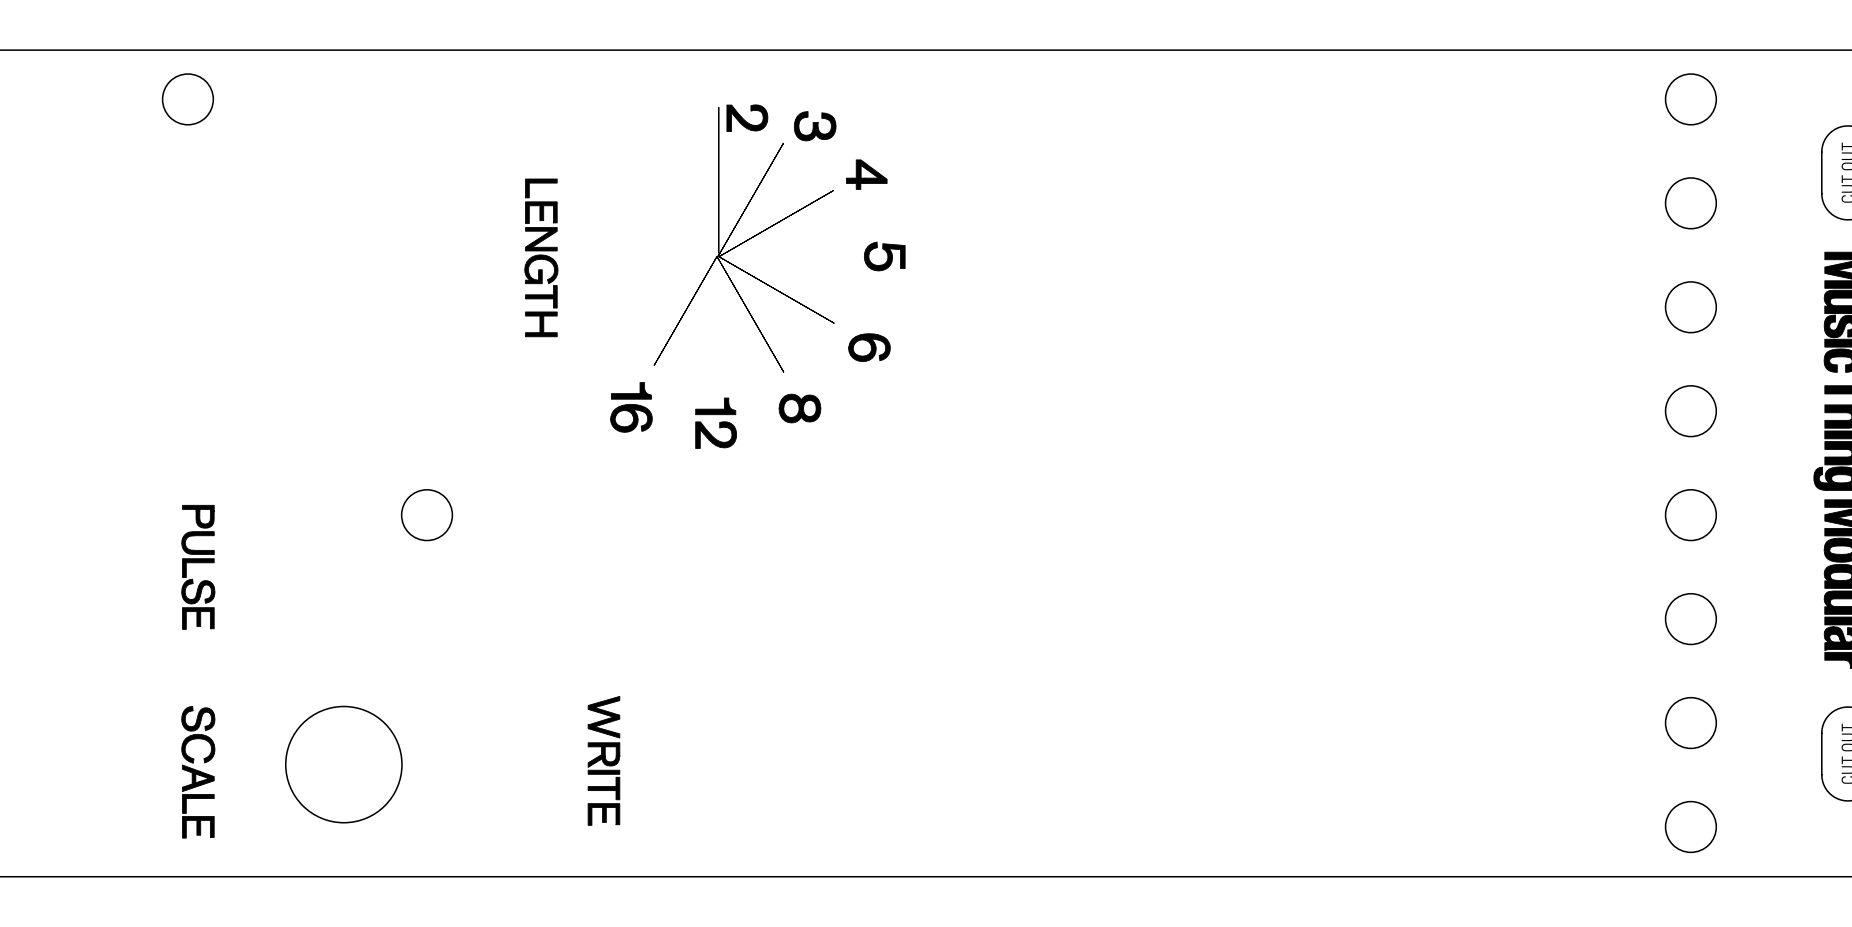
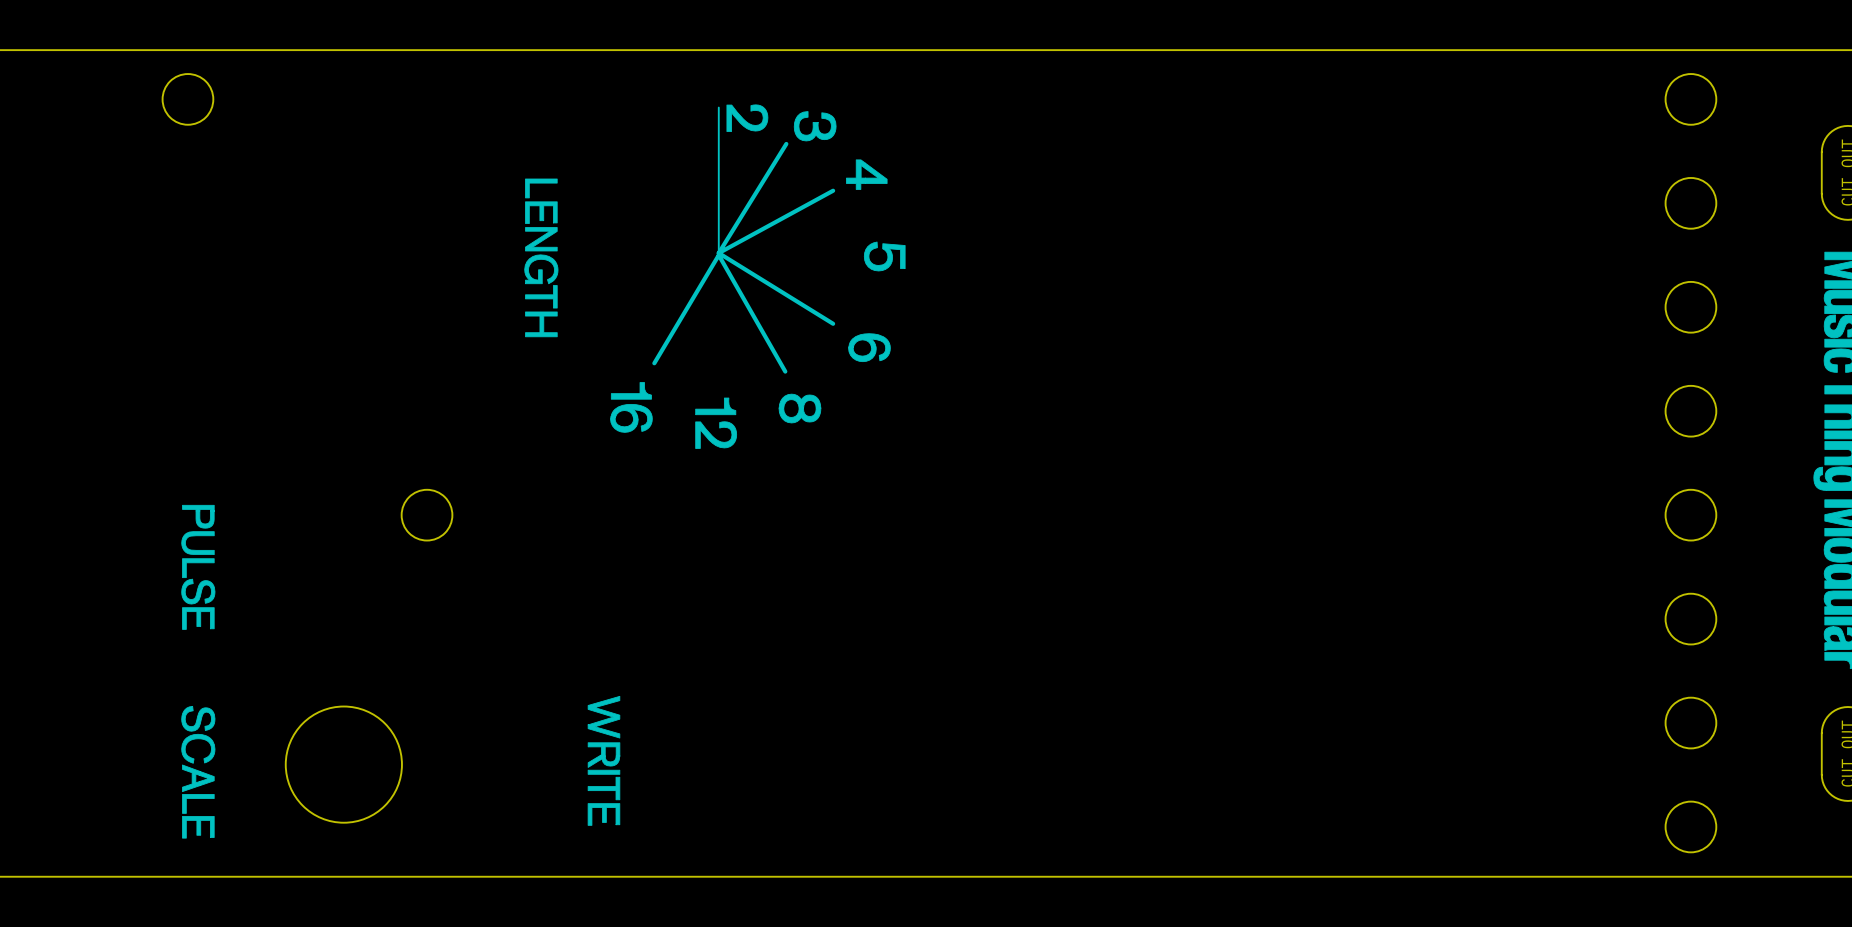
drawing: [653, 142, 835, 373] -> none
line: none -> (786, 143) (718, 253)
line: none -> (833, 190) (718, 253)
line: none -> (718, 253) (833, 323)
line: none -> (654, 363) (718, 255) (785, 371)

